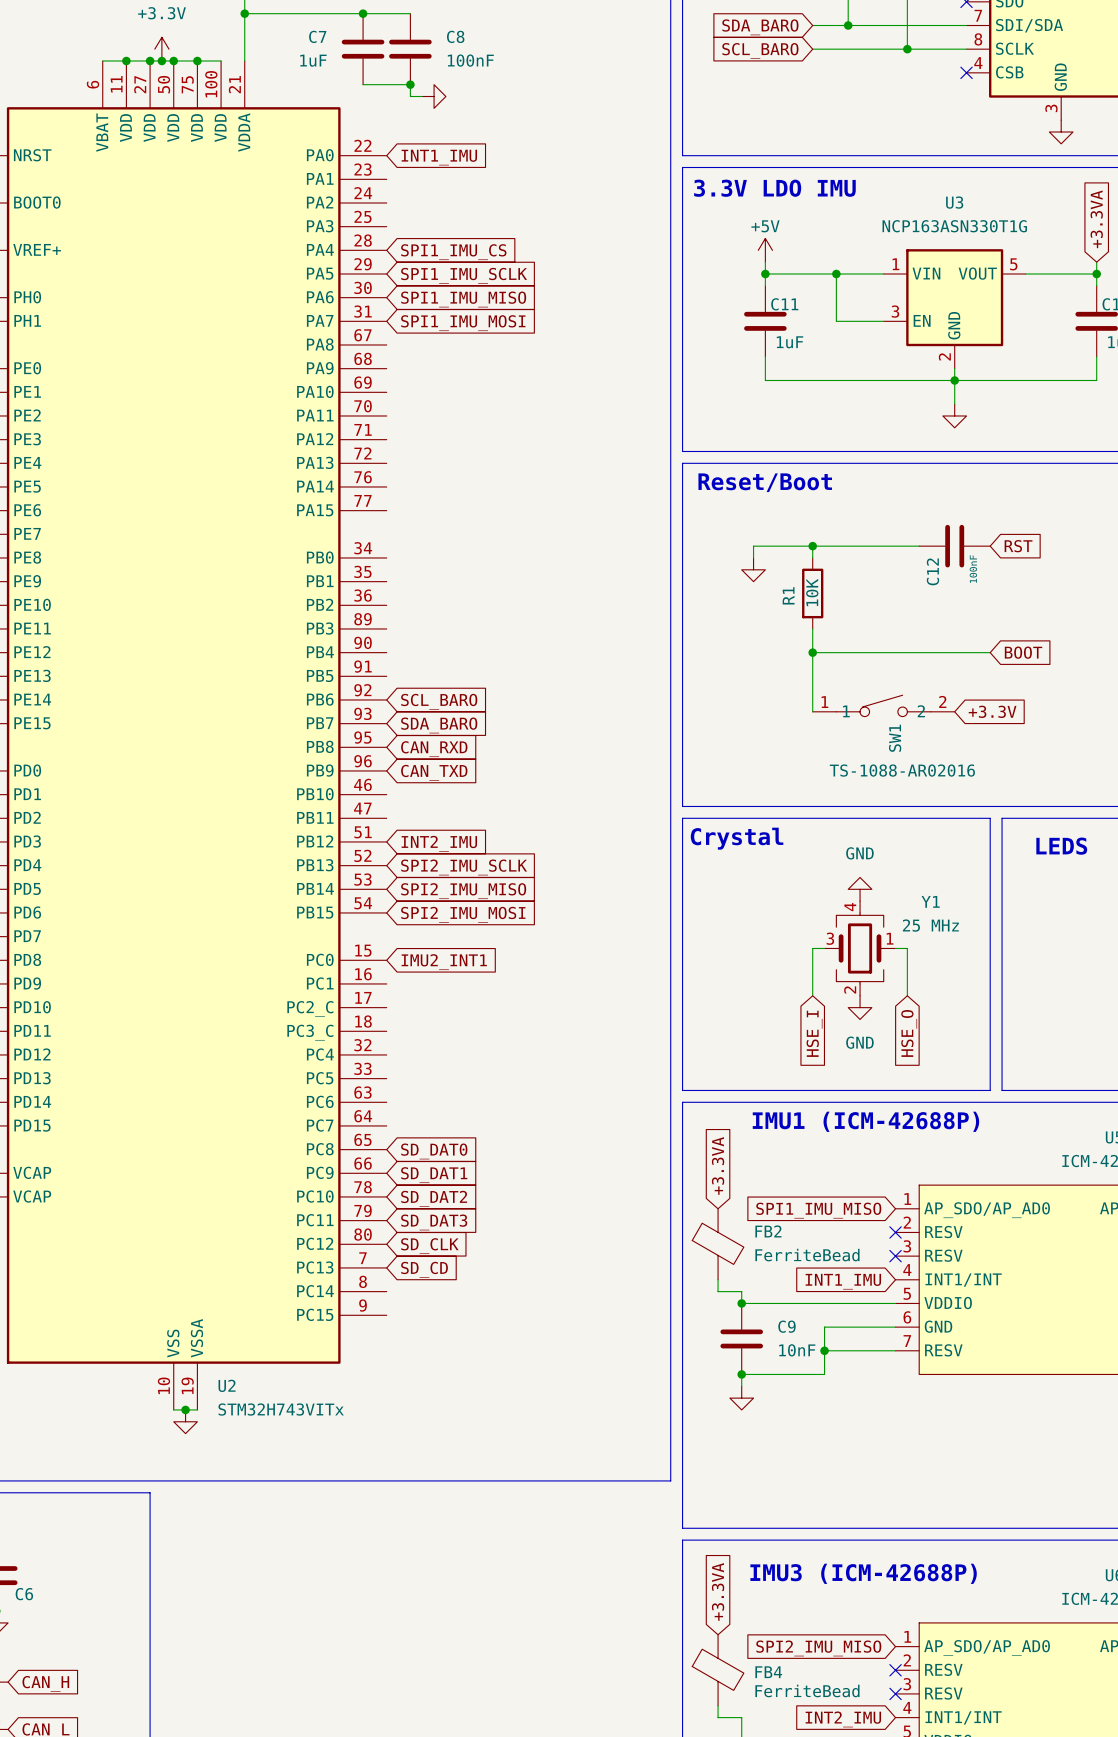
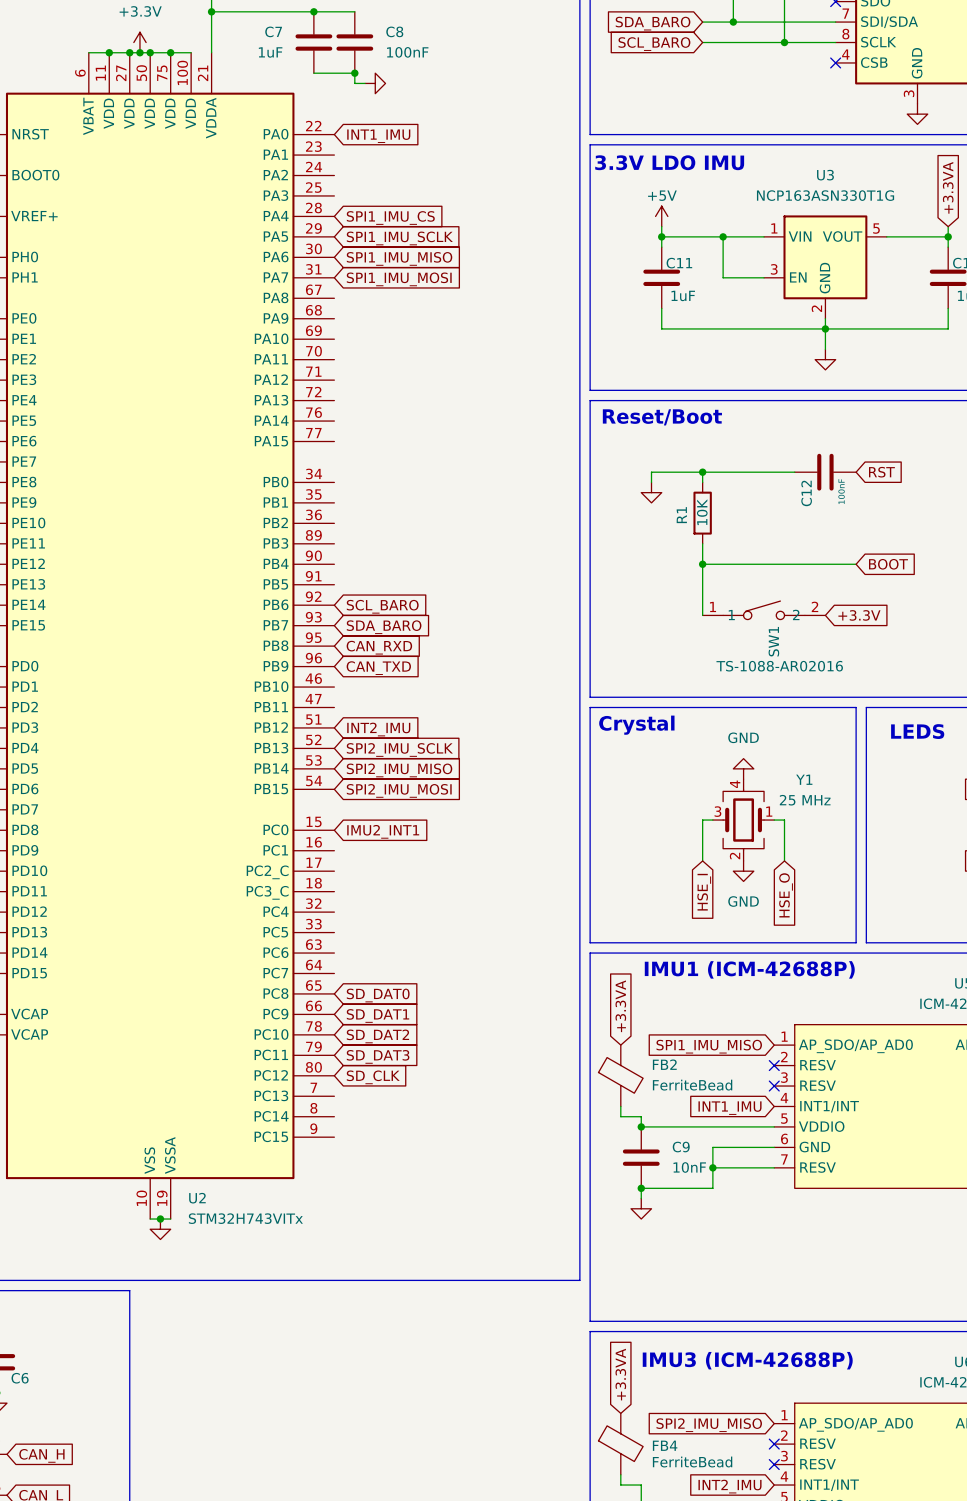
global label: SD_CD (424, 1269) -> none

